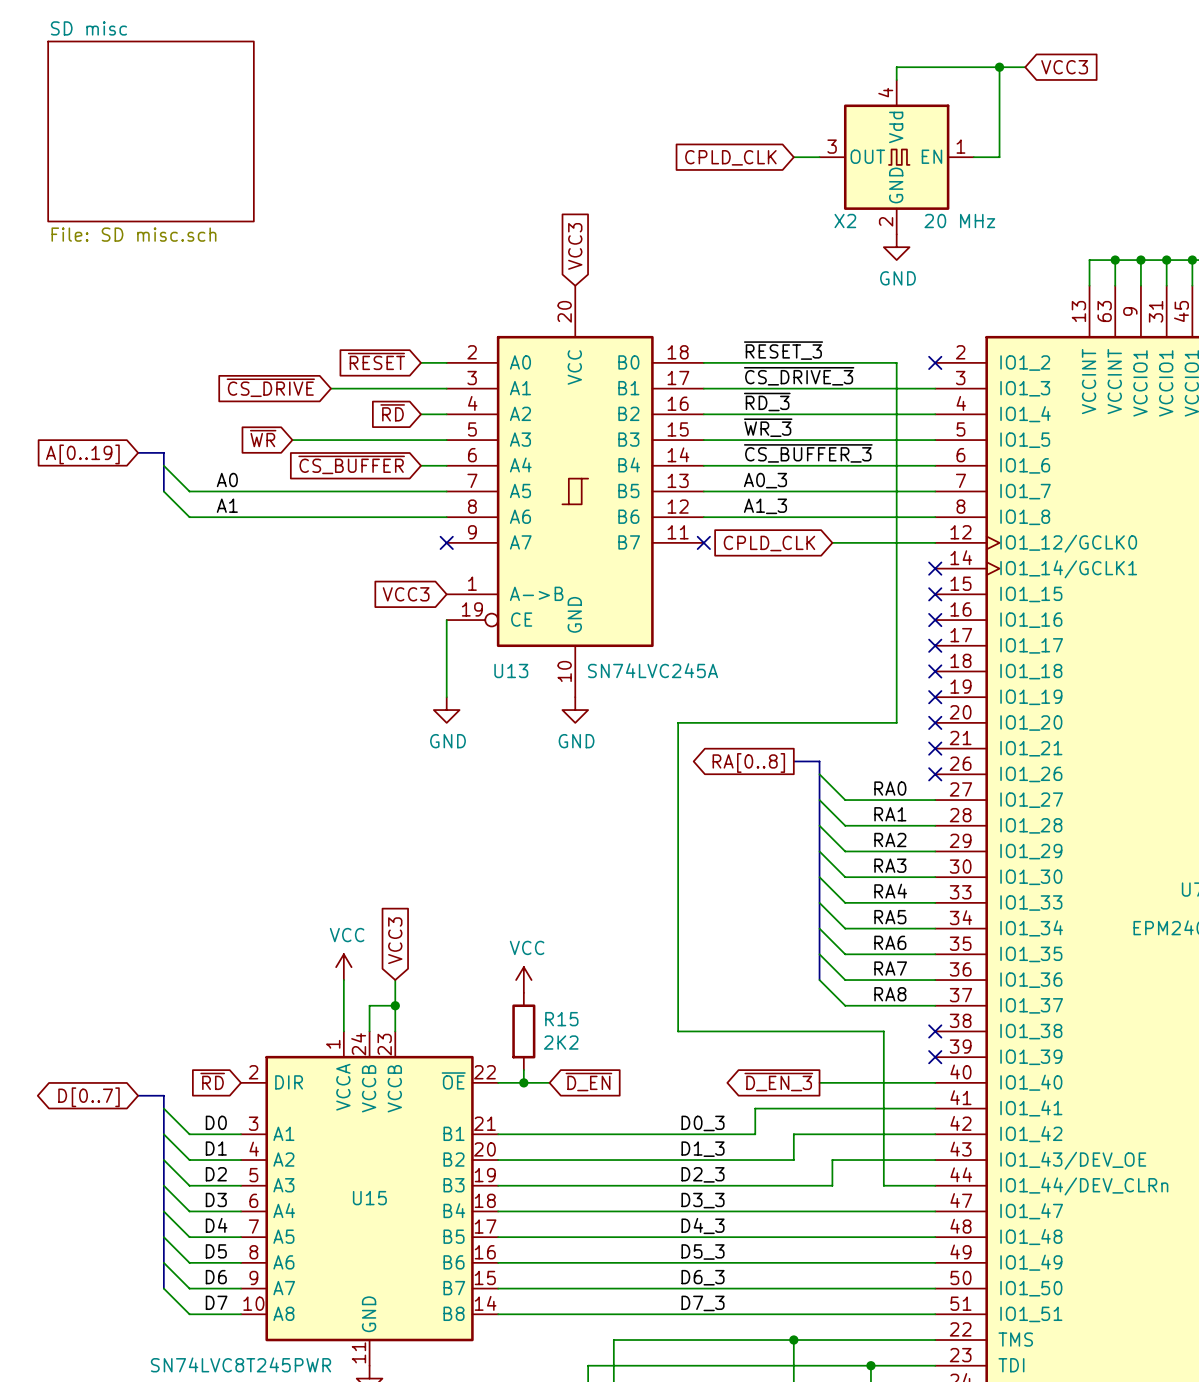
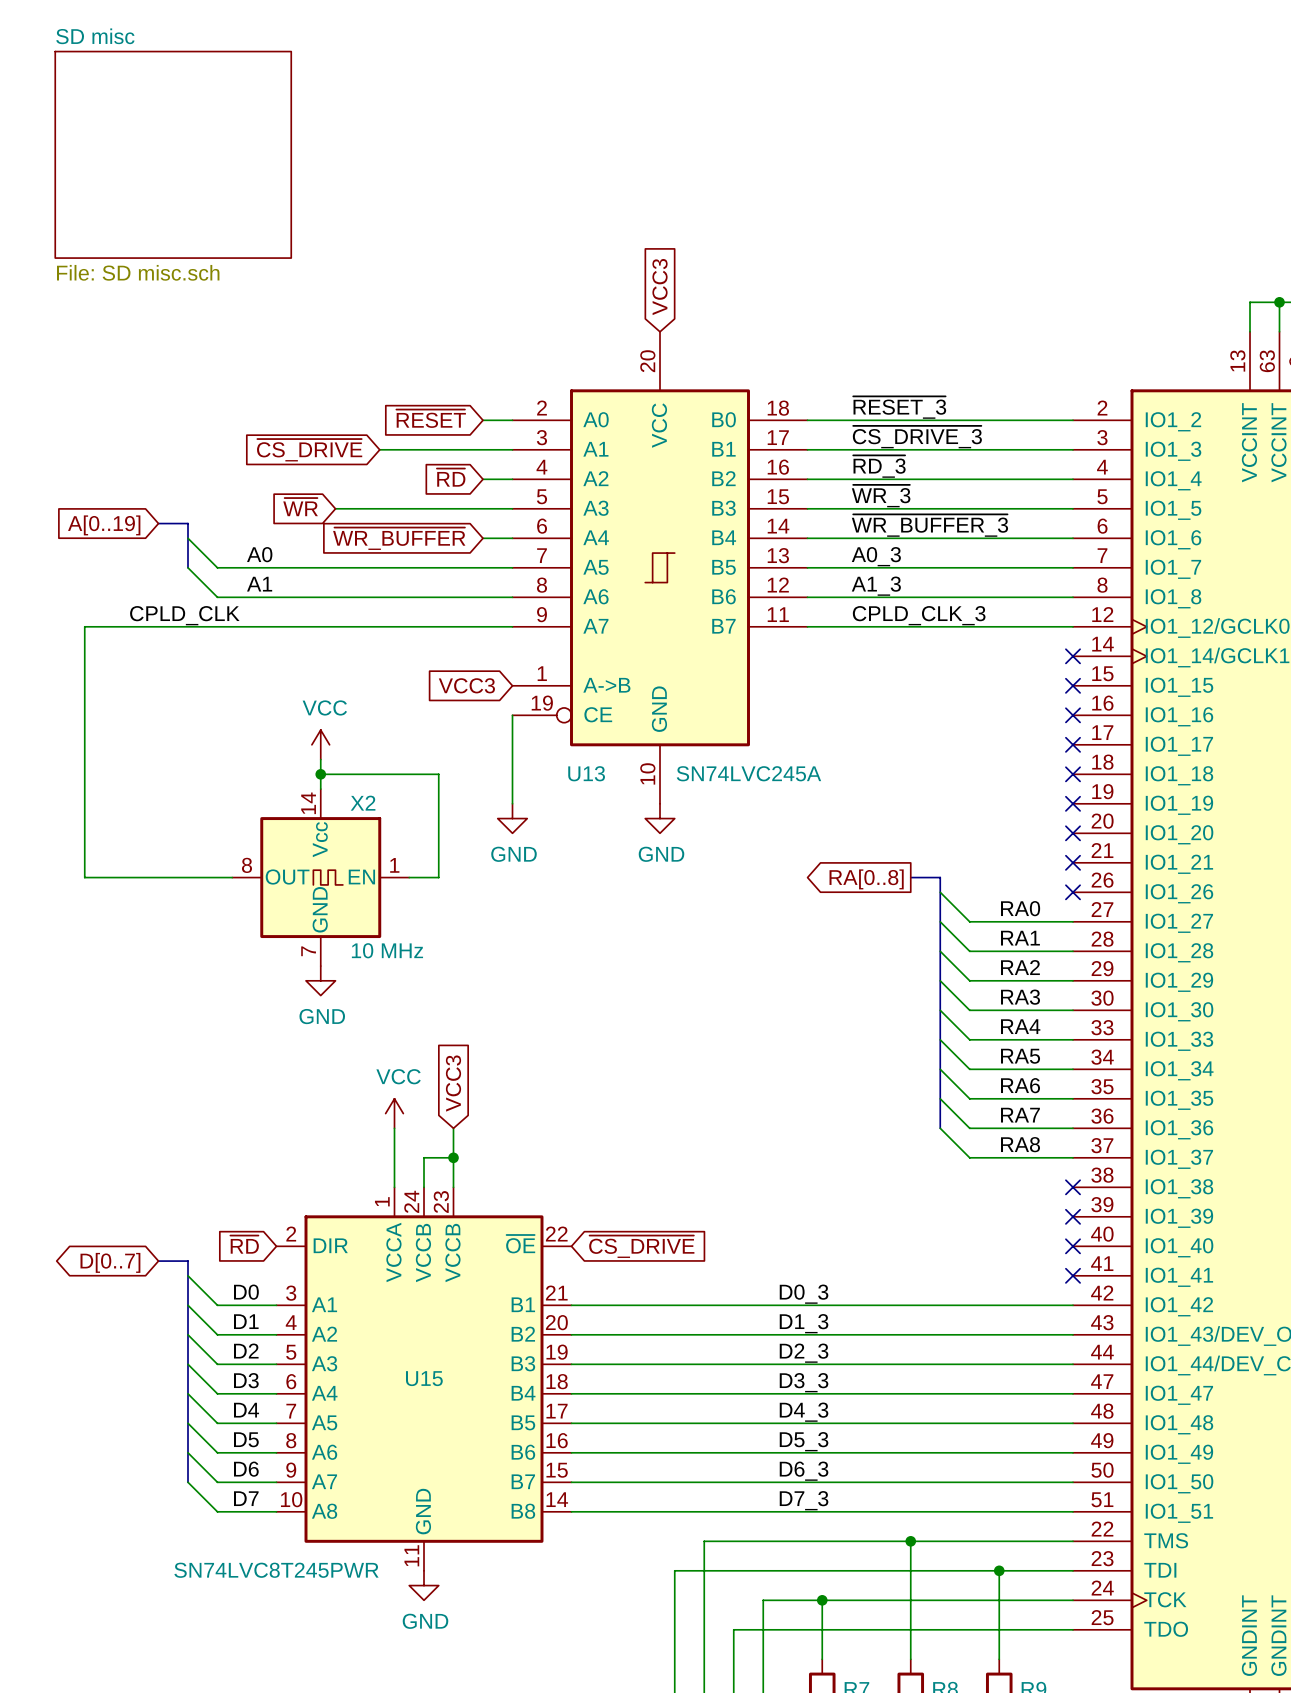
wire: (999, 67) (999, 157) (973, 157) -> none
junction: (999, 67) -> none
wire: (1025, 67) (896, 67) (896, 80) -> none
global label: VCC3 (1064, 67) -> none
X2 symbol: [819, 80, 974, 235] -> [232, 789, 410, 967]
global label: CPLD_CLK (730, 157) -> none
wire: (793, 157) (819, 157) -> none
X2 name position: X2 (845, 221) -> X2 (363, 803)
X2 value: 20 MHz (959, 221) -> 10 MHz (387, 950)
power symbol: GND (896, 247) -> none
wire: (896, 362) (896, 722) (678, 722) (678, 1031) (883, 1031) (883, 1185) -> (1028, 420) (1073, 420)
no-connect mark: (935, 362) -> none
label: ~{CS_BUFFER_3} (808, 453) -> ~{WR_BUFFER_3} (929, 525)
global label: ~{CS_BUFFER} (351, 464) -> ~{WR_BUFFER} (399, 538)
label: none -> CPLD_CLK (184, 615)
label: none -> CPLD_CLK_3 (919, 615)
wire: none -> (512, 626) (84, 626) (84, 877) (232, 877)
no-connect mark: (446, 542) -> none
wire: none -> (807, 626) (955, 626)
no-connect mark: (703, 542) -> none
global label: CPLD_CLK (769, 543) -> none
power symbol: none -> VCC (320, 744)
wire: none -> (320, 759) (320, 789)
wire: none -> (320, 774) (438, 774) (438, 877) (409, 877)
junction: none -> (320, 774)
power symbol: none -> GND (320, 980)
power symbol: VCC (523, 980) -> none
R15: 2K2 (523, 1031) -> none
wire: (523, 1070) (523, 1082) -> none
wire: (498, 1082) (549, 1082) -> none
junction: (523, 1082) -> none
global label: none -> ~{CS_DRIVE} (641, 1246)
global label: ~{D_EN} (588, 1082) -> none
global label: ~{D_EN_3} (778, 1082) -> none
wire: (819, 1082) (935, 1082) -> none
no-connect mark: none -> (1073, 1246)
wire: (935, 1108) (755, 1108) (755, 1134) -> none
no-connect mark: none -> (1073, 1275)
wire: (793, 1134) (793, 1160) -> (910, 1305) (866, 1305)
wire: (832, 1160) (832, 1185) -> (955, 1334) (910, 1334)
wire: none -> (955, 1364) (1014, 1364)

